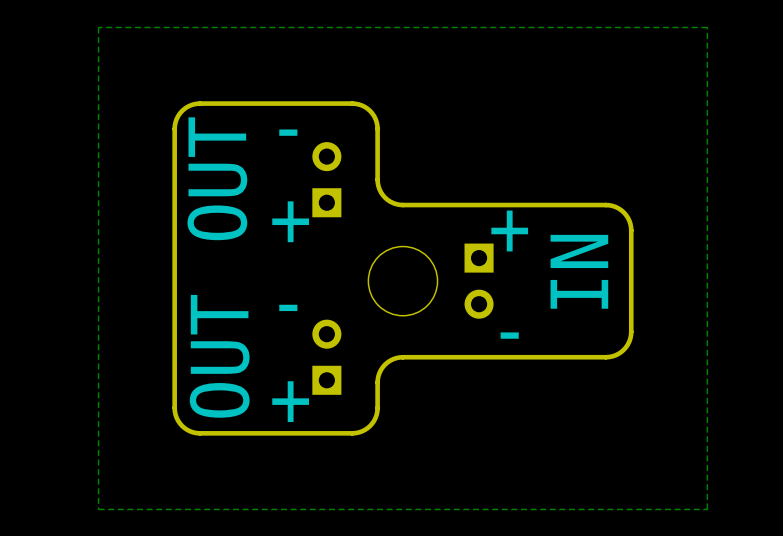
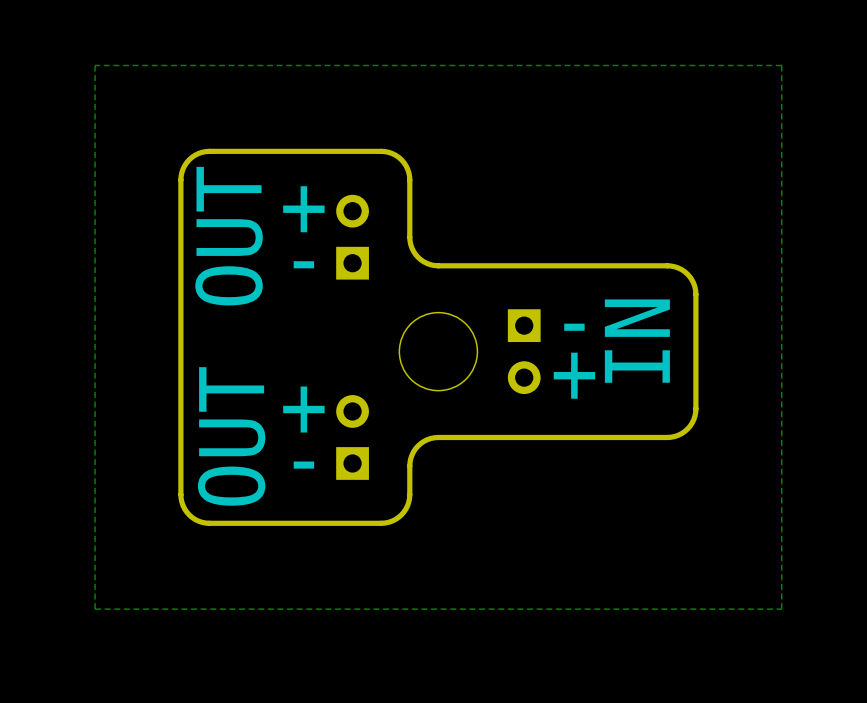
text: - (288, 132) -> none
text: none -> + (303, 209)
text: + (290, 221) -> - (303, 264)
text position: + (509, 230) -> + (574, 375)
text position: - (288, 307) -> - (303, 465)
text position: - (509, 335) -> - (574, 327)
text position: + (290, 401) -> + (303, 409)

